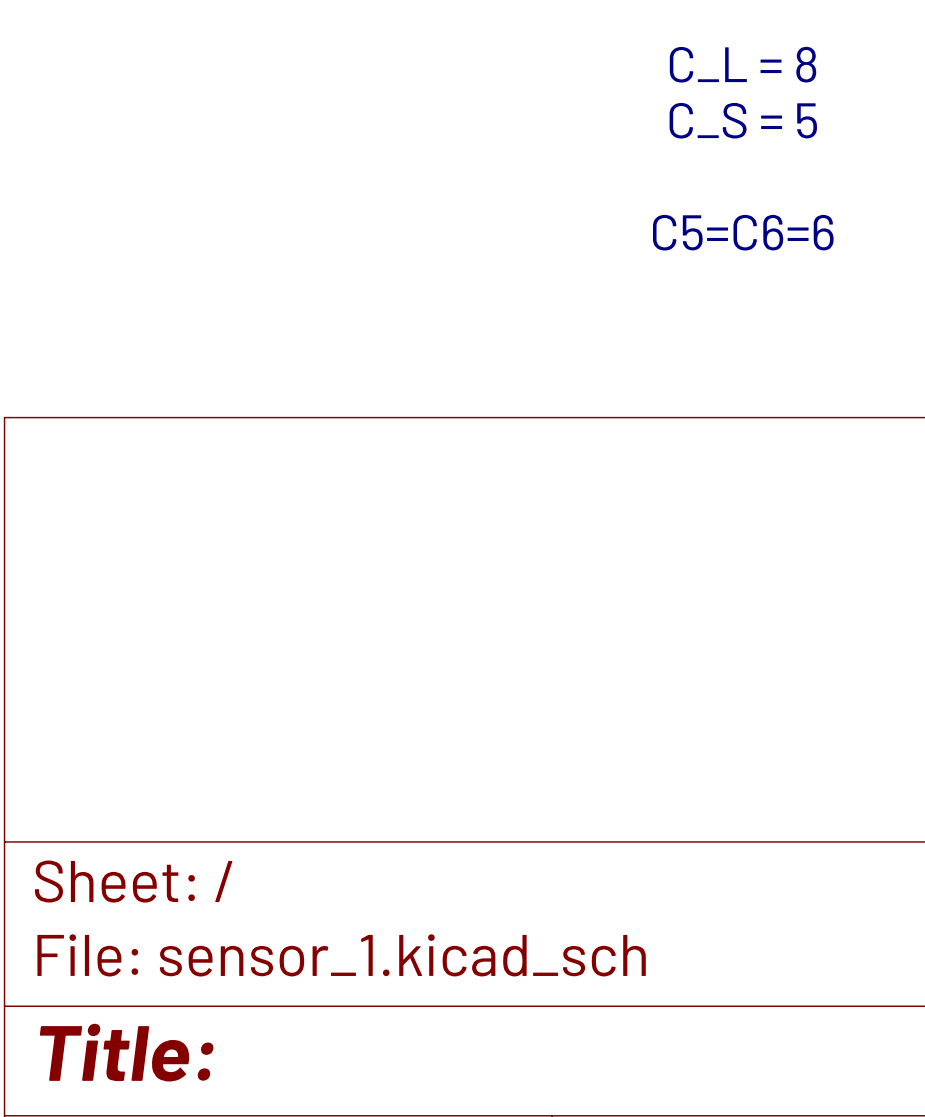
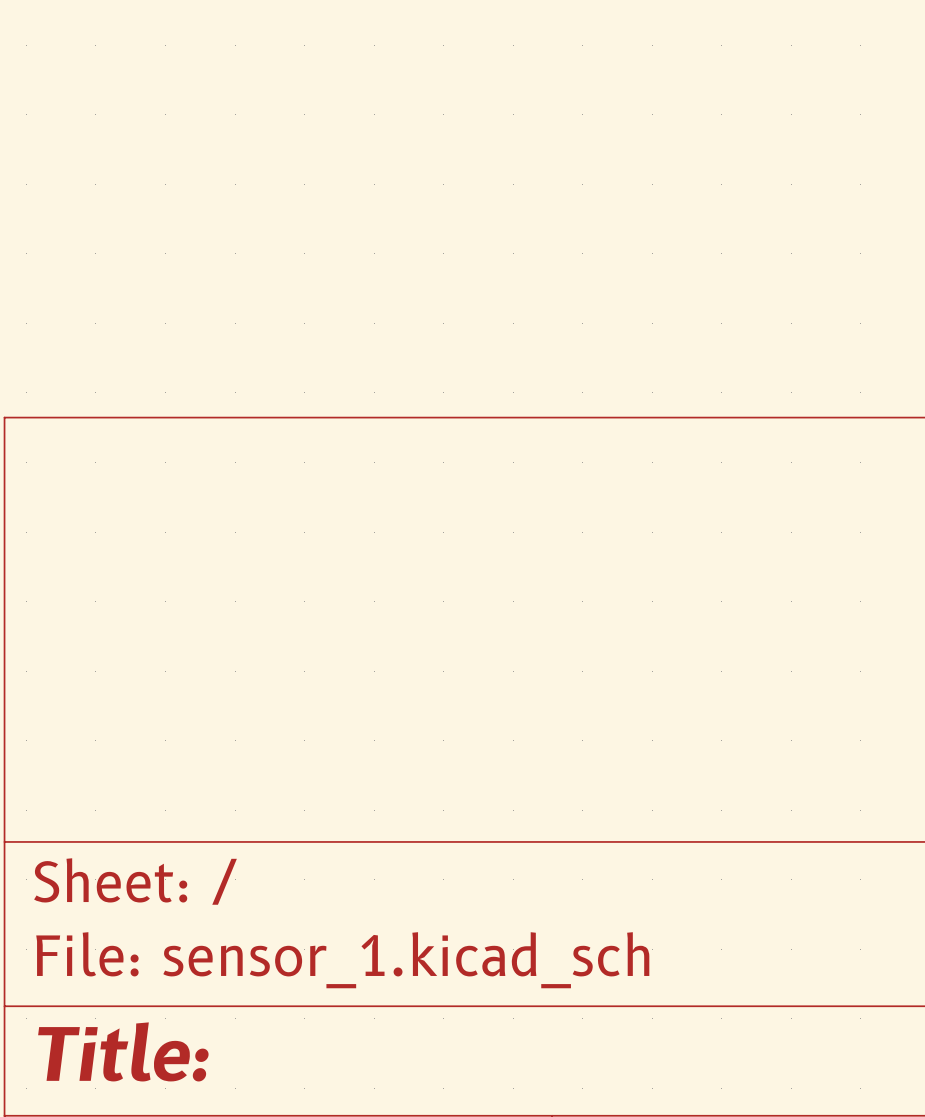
text: C_L = 8 (743, 64) -> none
text: C_S = 5 (743, 120) -> none
text: C5=C6=6 (743, 232) -> none

